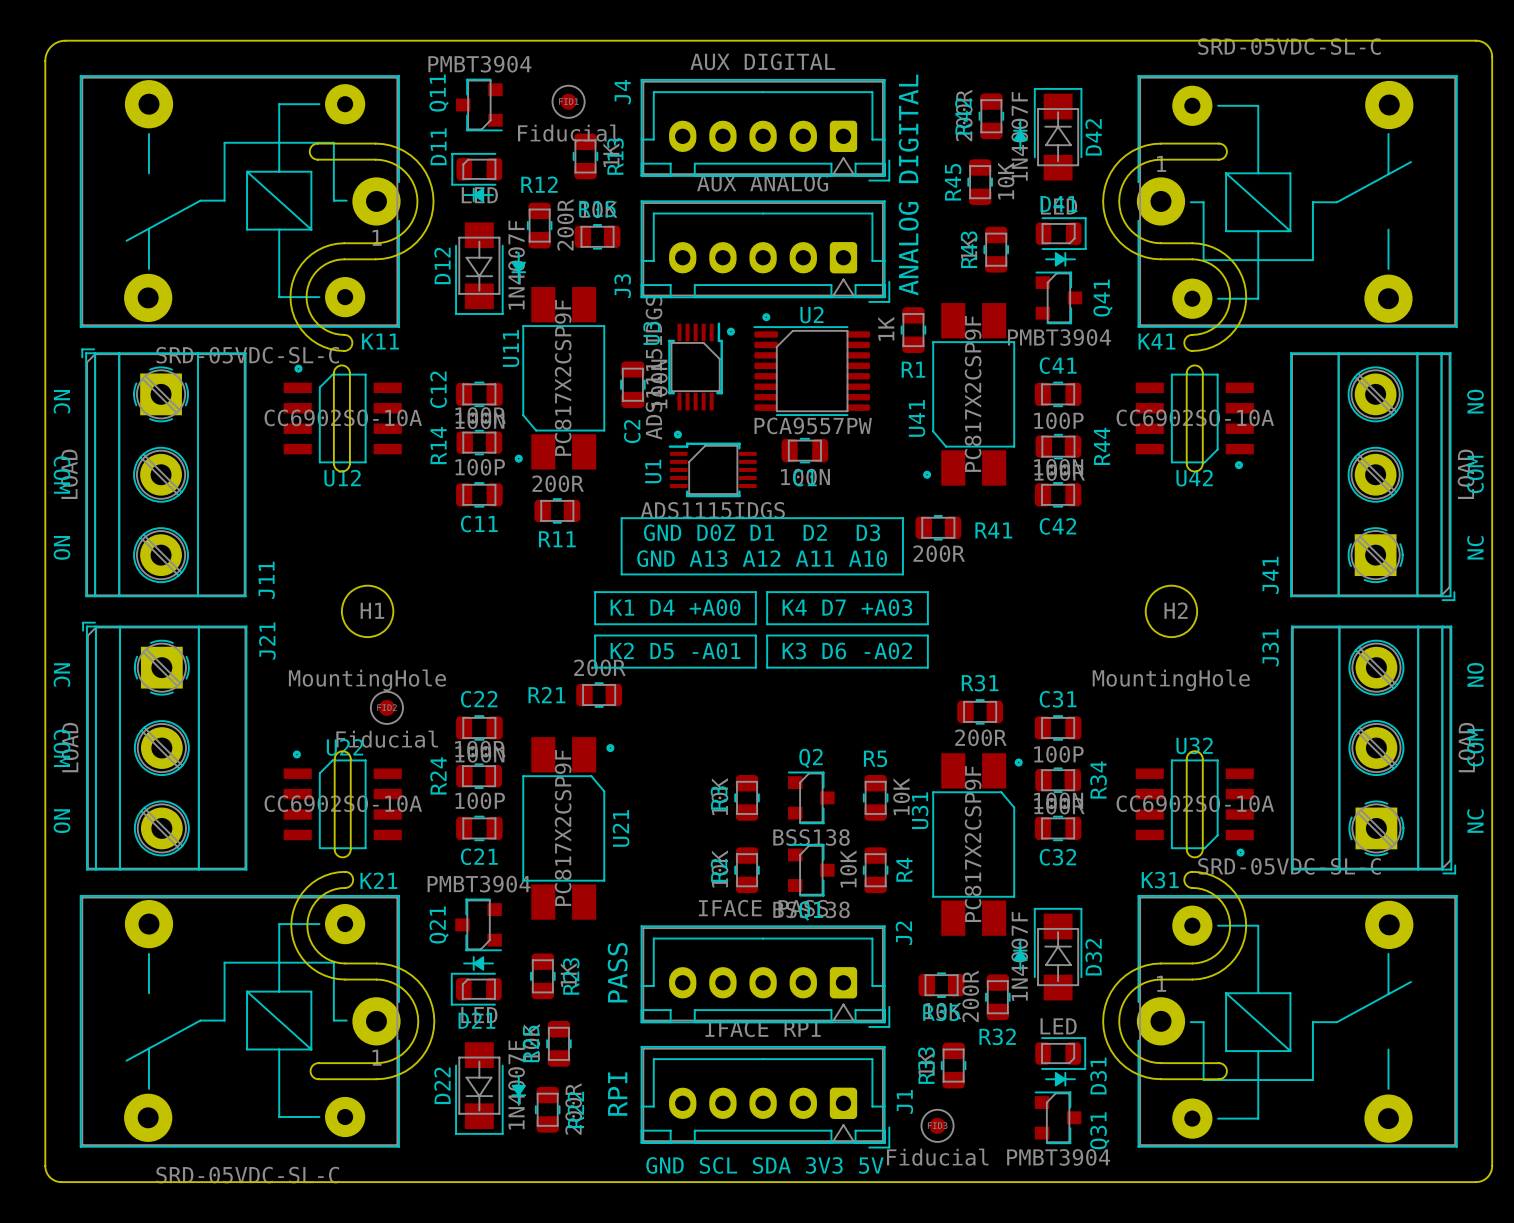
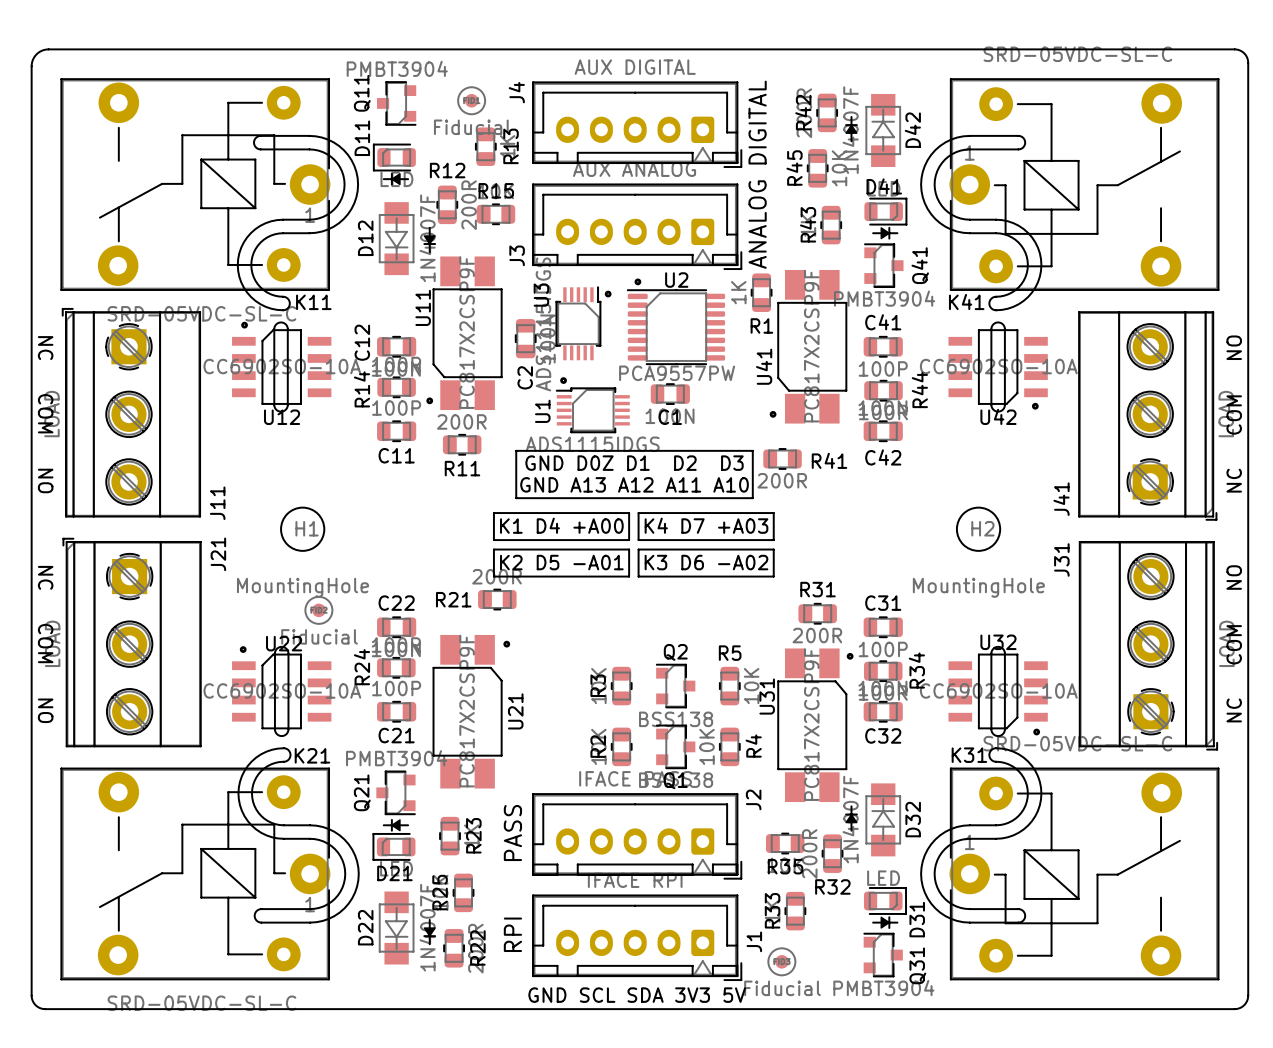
D42 footprint: [1033, 87, 1083, 181] -> [865, 93, 901, 167]
D12 footprint: [455, 222, 504, 315] -> [378, 202, 415, 276]
D32 footprint: [1033, 907, 1083, 1001] -> [865, 783, 901, 857]
D22 footprint: [455, 1042, 504, 1135] -> [378, 891, 415, 965]

